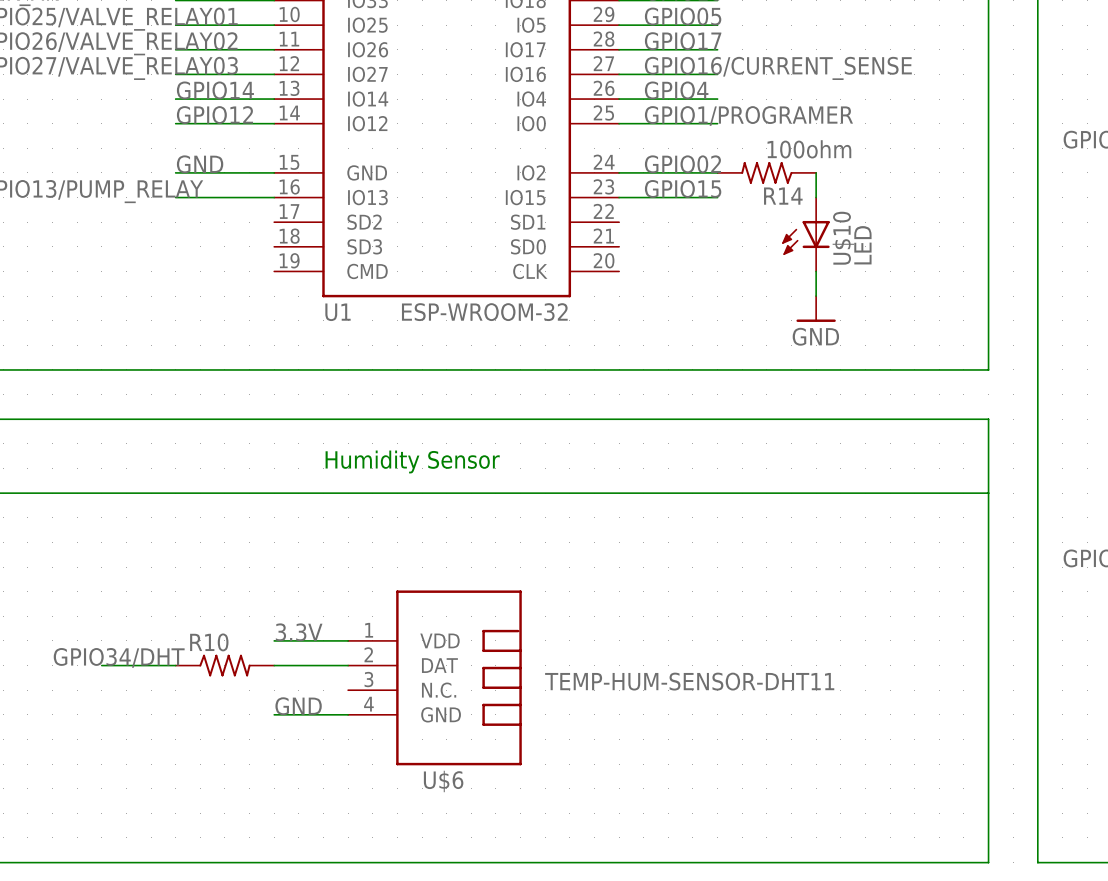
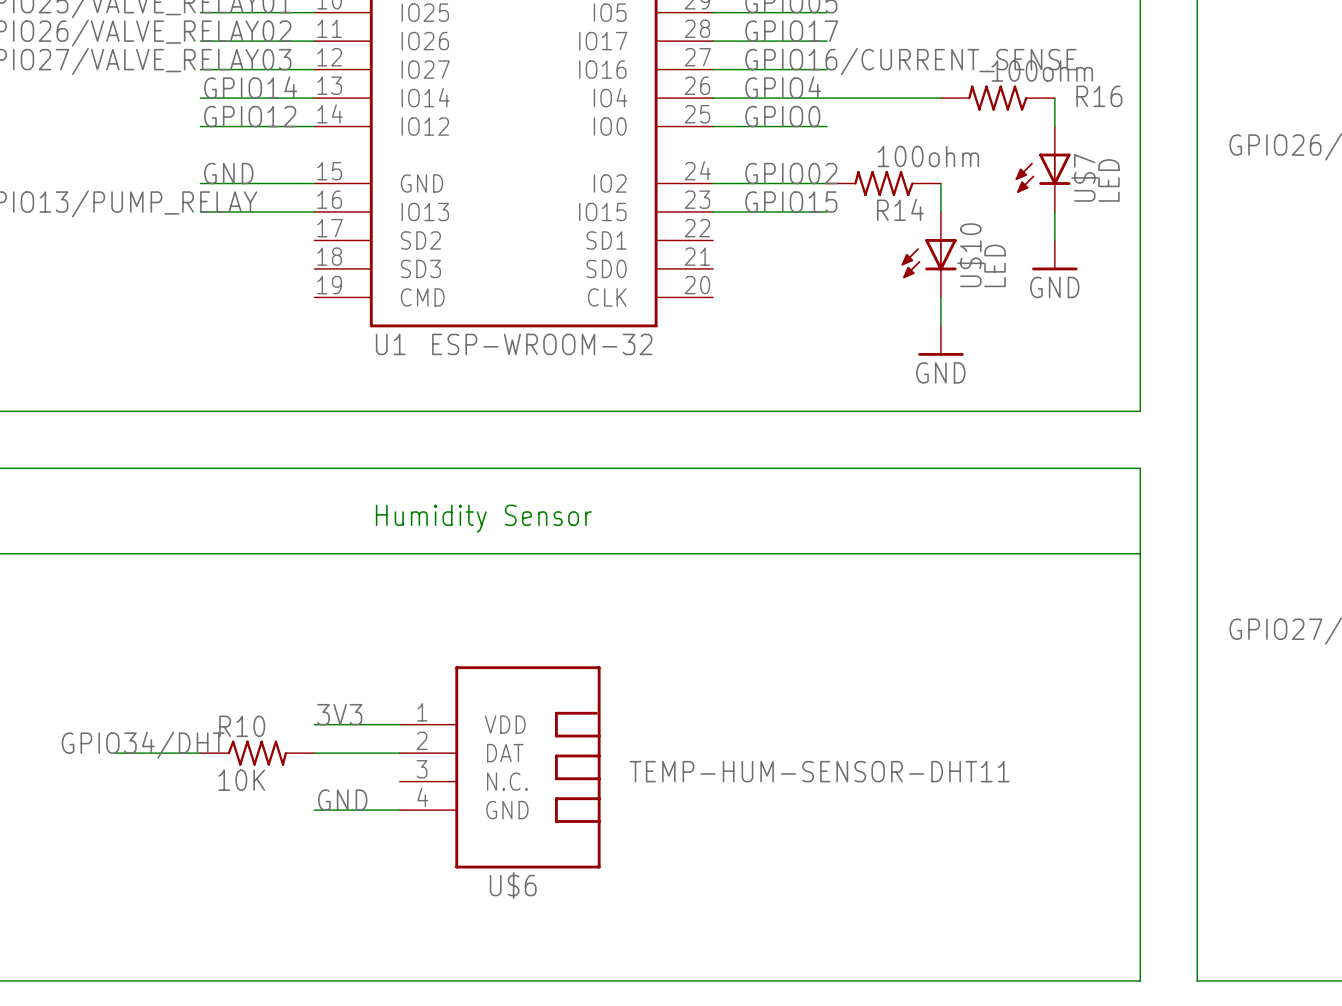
wire: none -> (827, 98) (940, 98)
R16: none -> 100ohm (997, 98)
wire: none -> (1054, 98) (1054, 126)
label: GPIO1/PROGRAMER (748, 115) -> GPIO0 (782, 116)
U$7: none -> LED (1043, 169)
wire: none -> (1054, 211) (1054, 240)
power symbol: none -> GND (1054, 255)
label: 3.3V (299, 632) -> 3V3 (339, 714)
R10 value: none -> 10K (241, 780)

